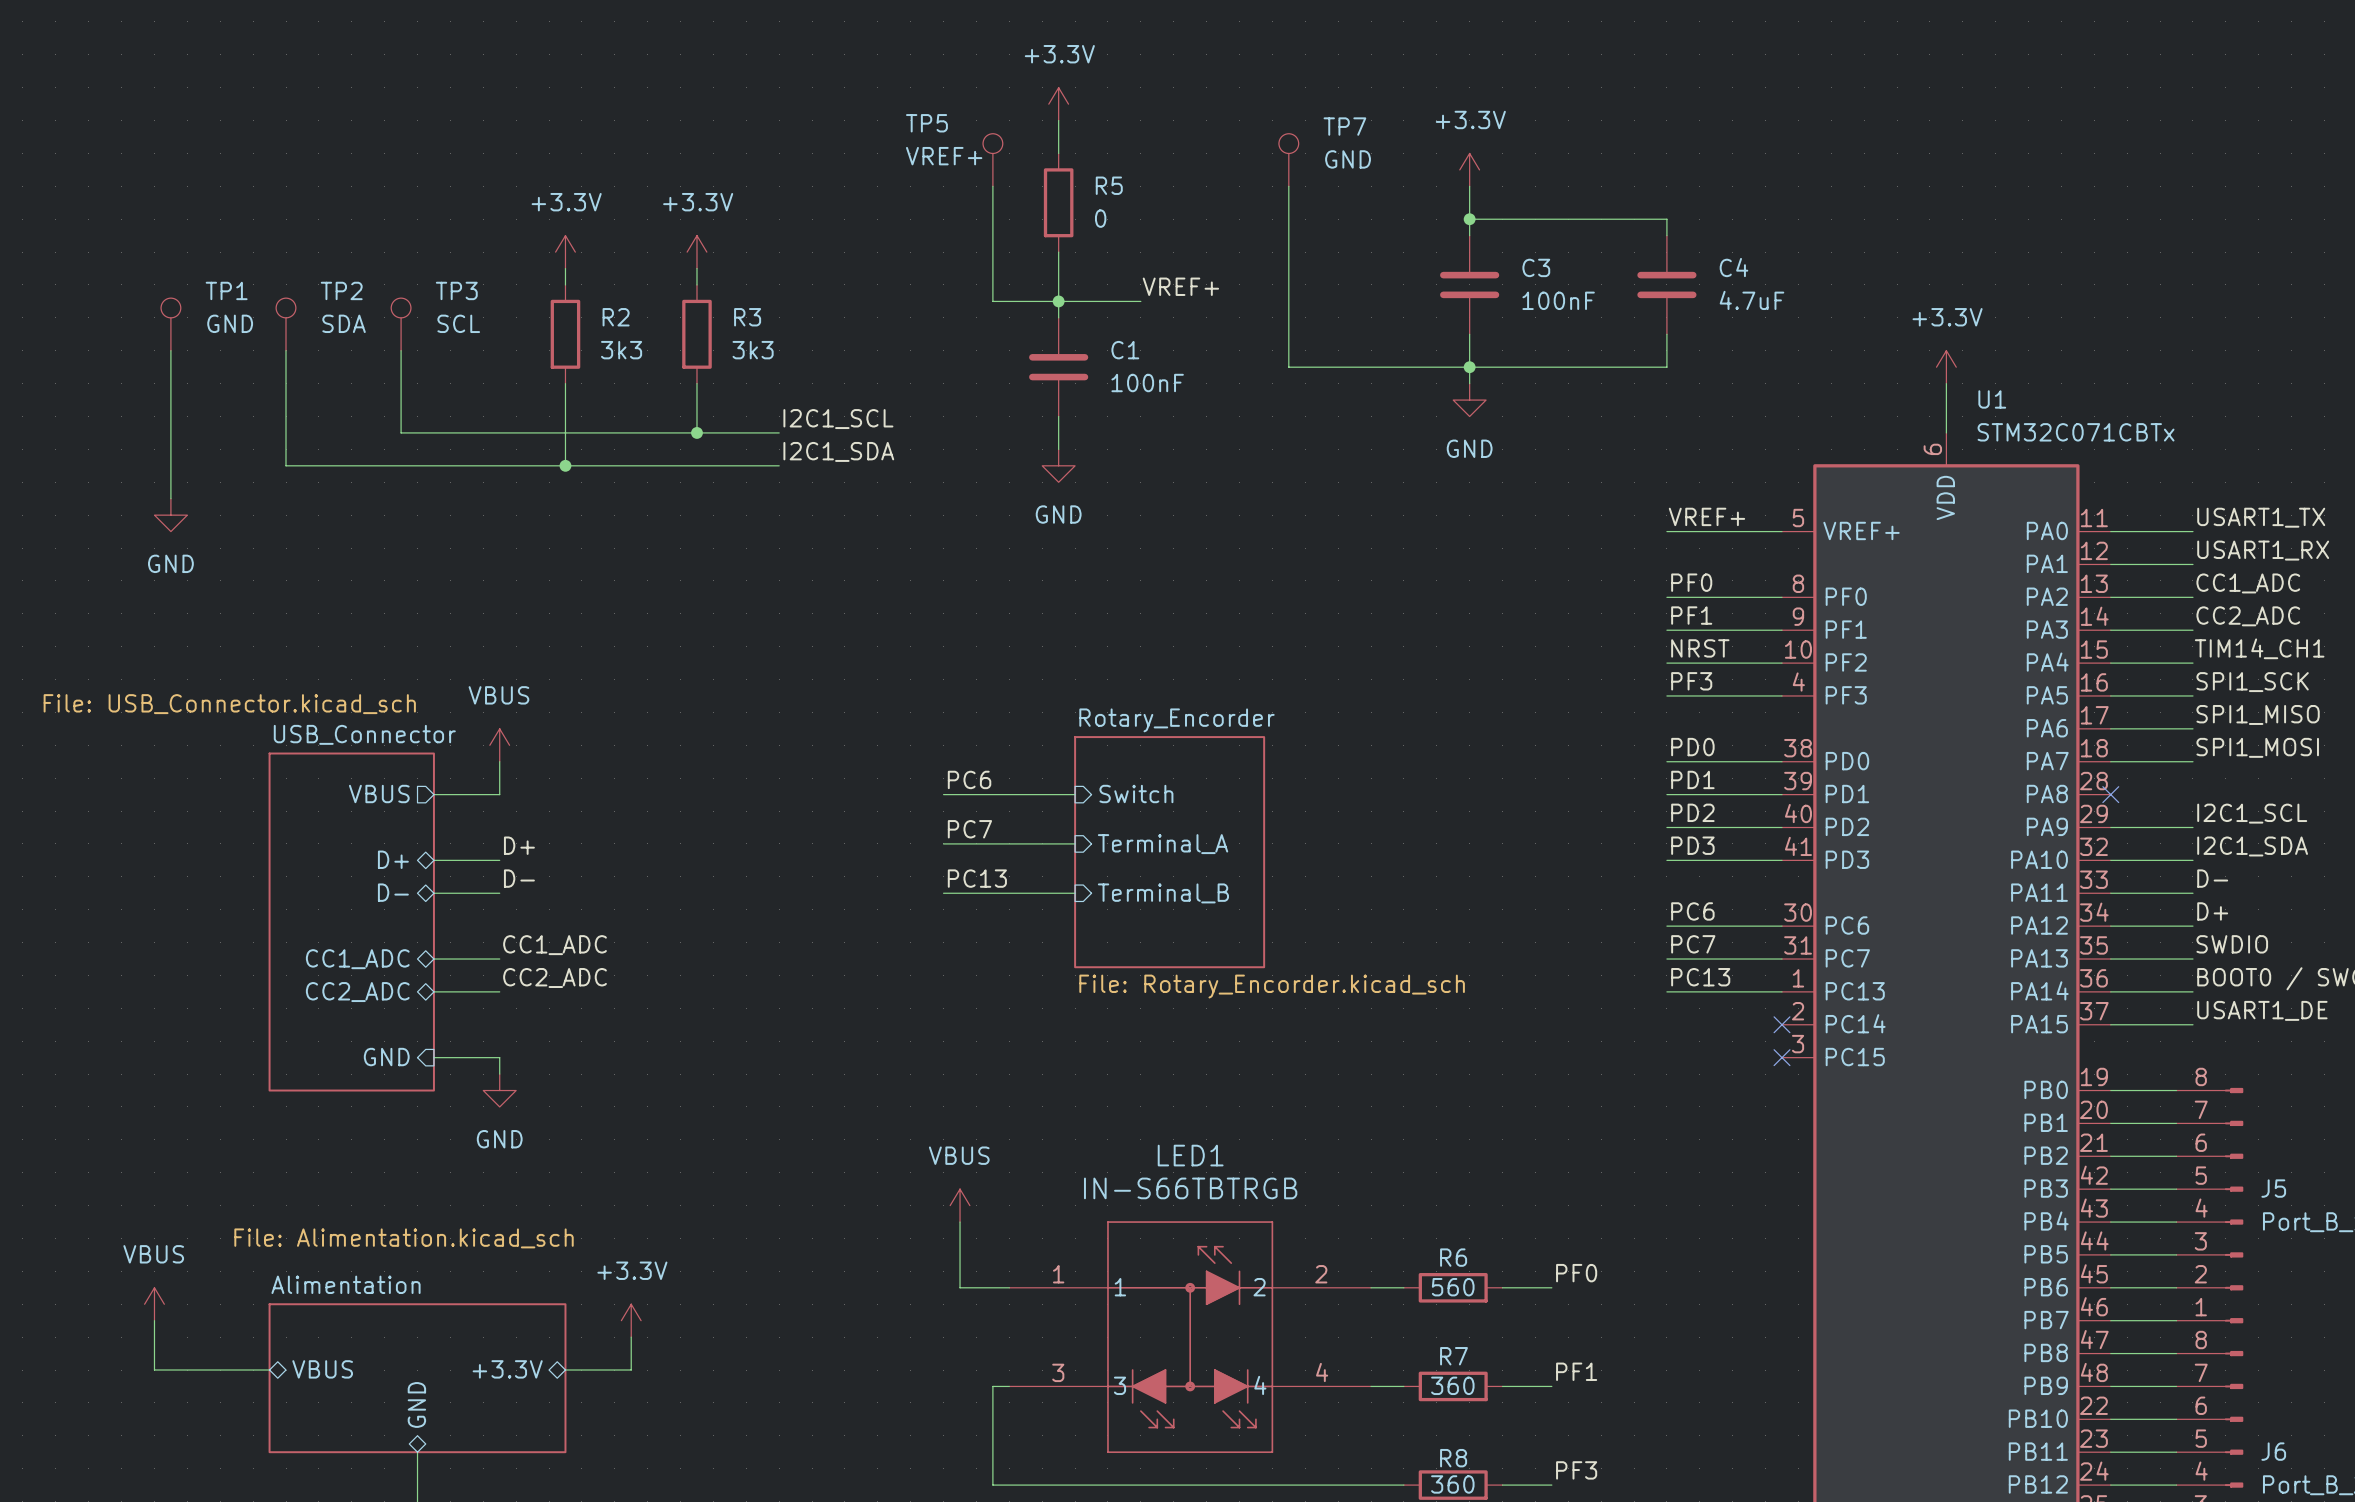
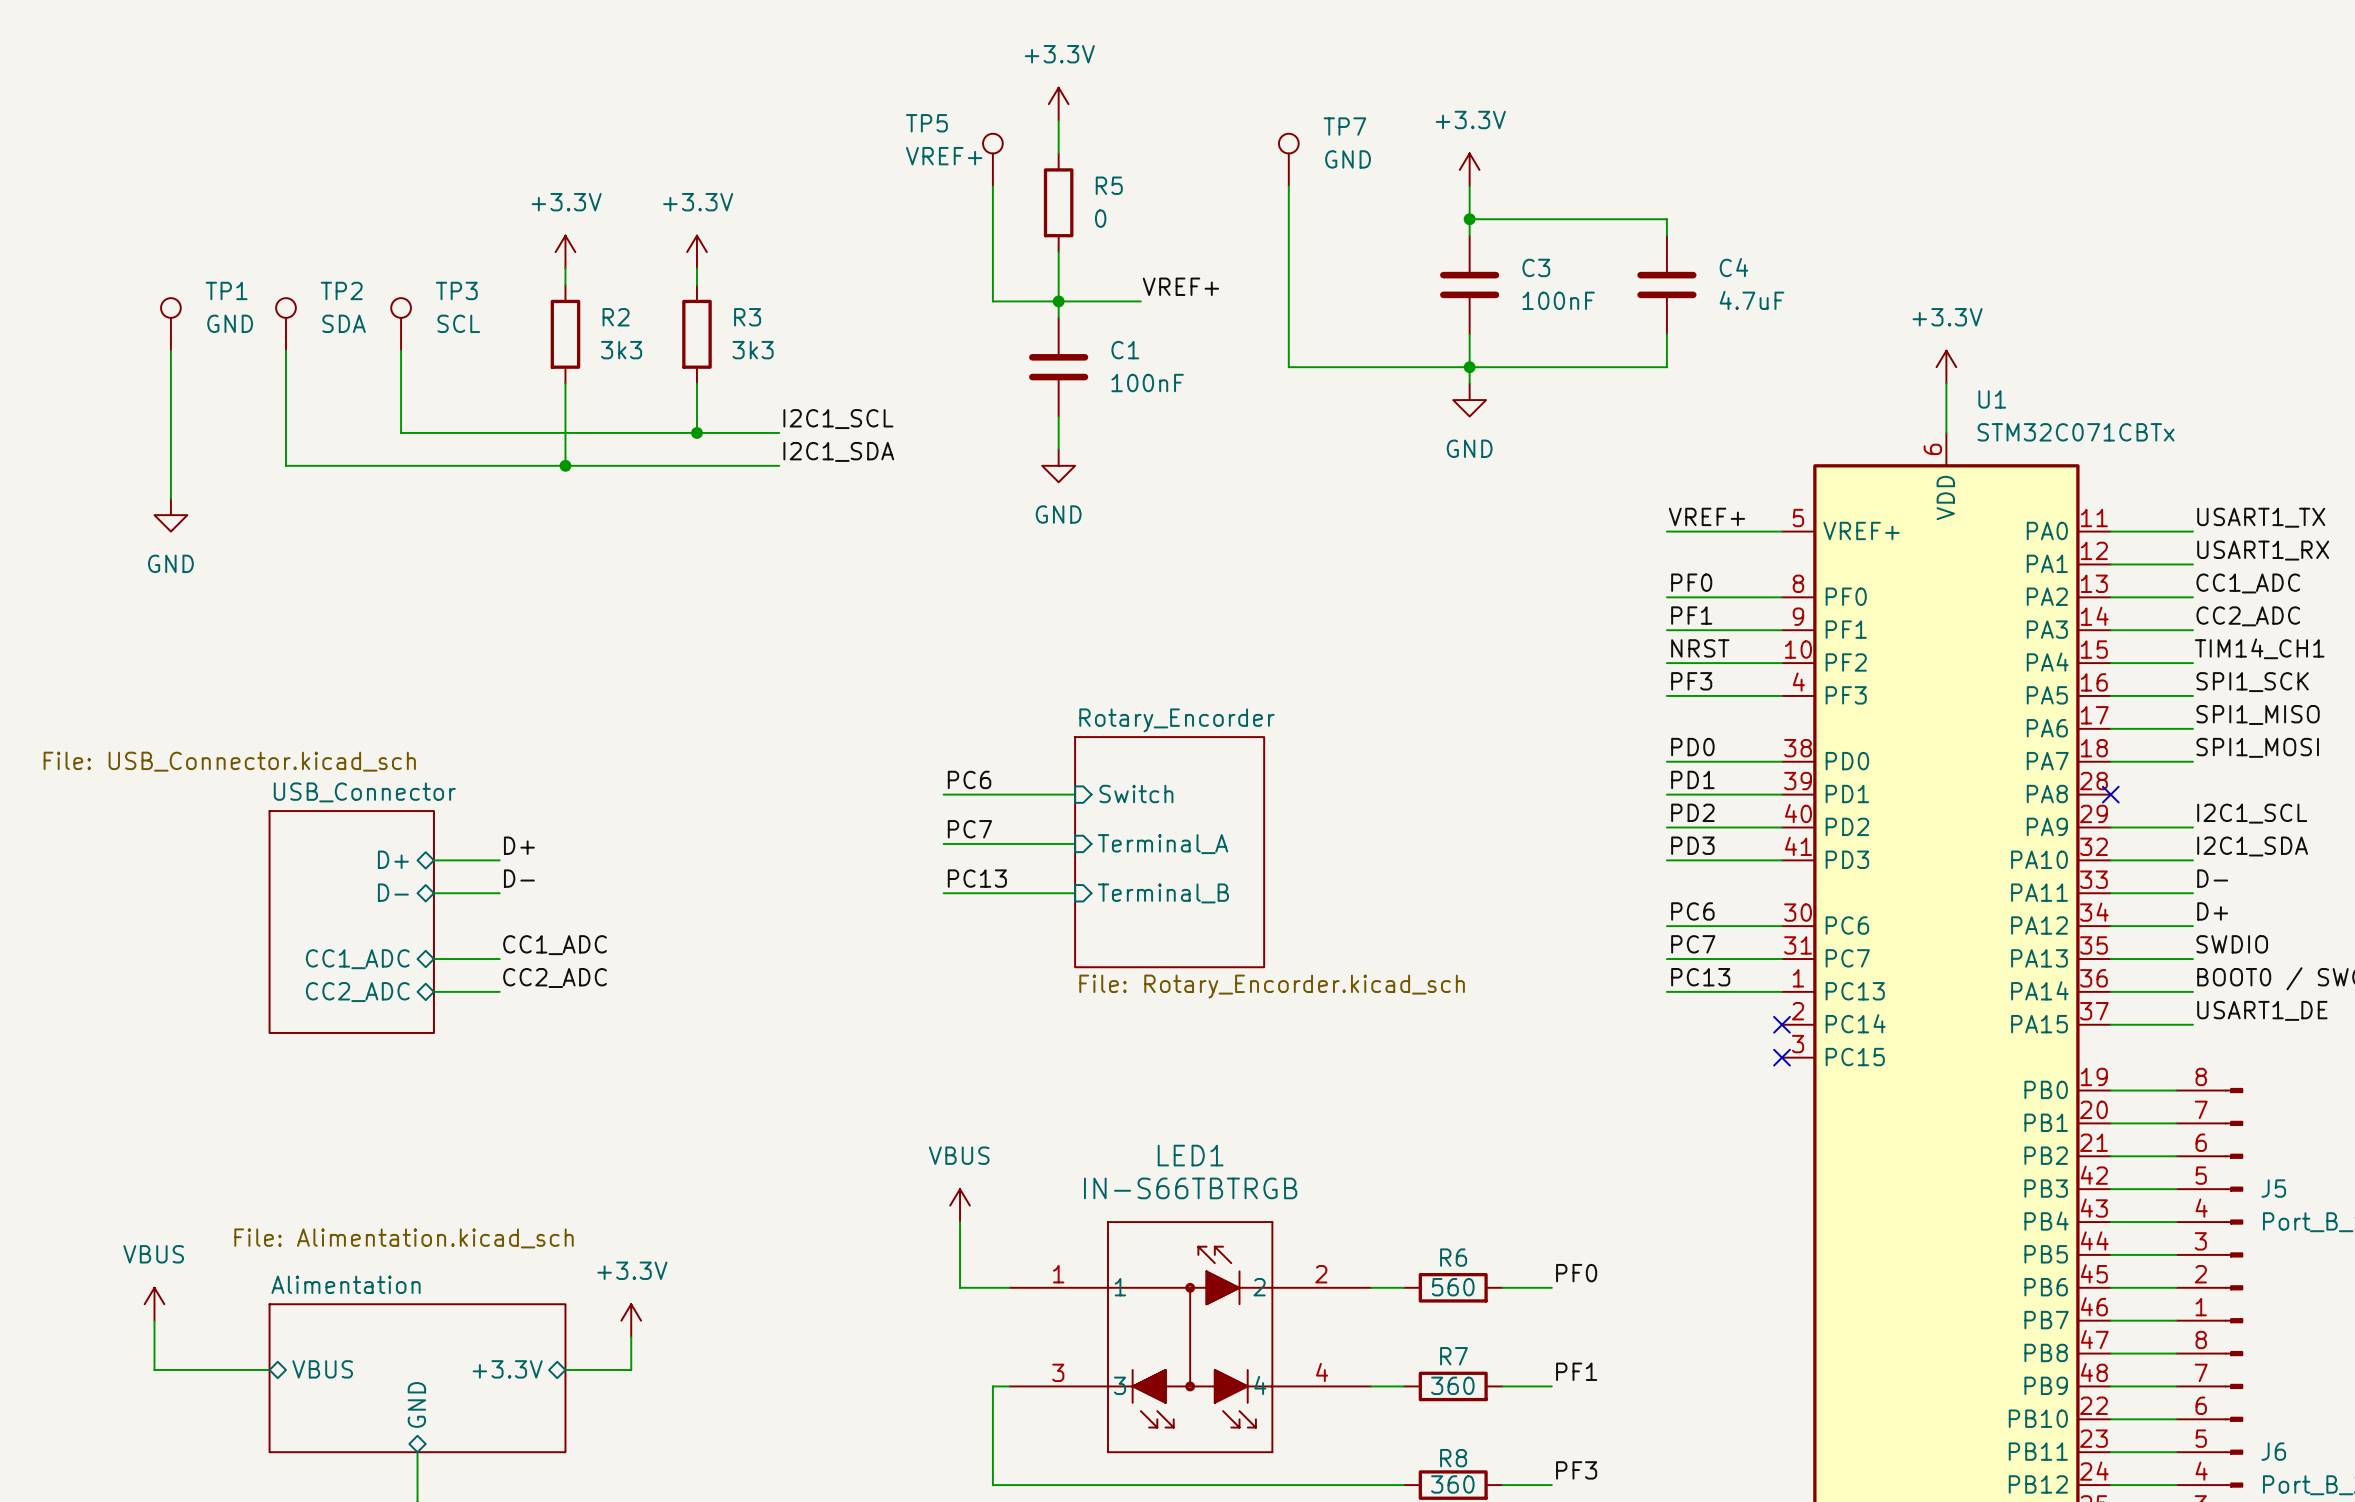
sheet USB_Connector value position: File: USB_Connector.kicad_sch (229, 704) -> File: USB_Connector.kicad_sch (229, 761)
sheet USB_Connector name position: USB_Connector (364, 734) -> USB_Connector (364, 792)
power symbol: VBUS (499, 745) -> none
sheet USB_Connector shape: [268, 752, 435, 1092] -> [268, 810, 435, 1034]
wire: (499, 761) (499, 794) (433, 794) -> none
sheet pin: VBUS (379, 794) -> none
sheet pin: GND (386, 1057) -> none
wire: (433, 1057) (499, 1057) (499, 1074) -> none
power symbol: GND (499, 1090) -> none

